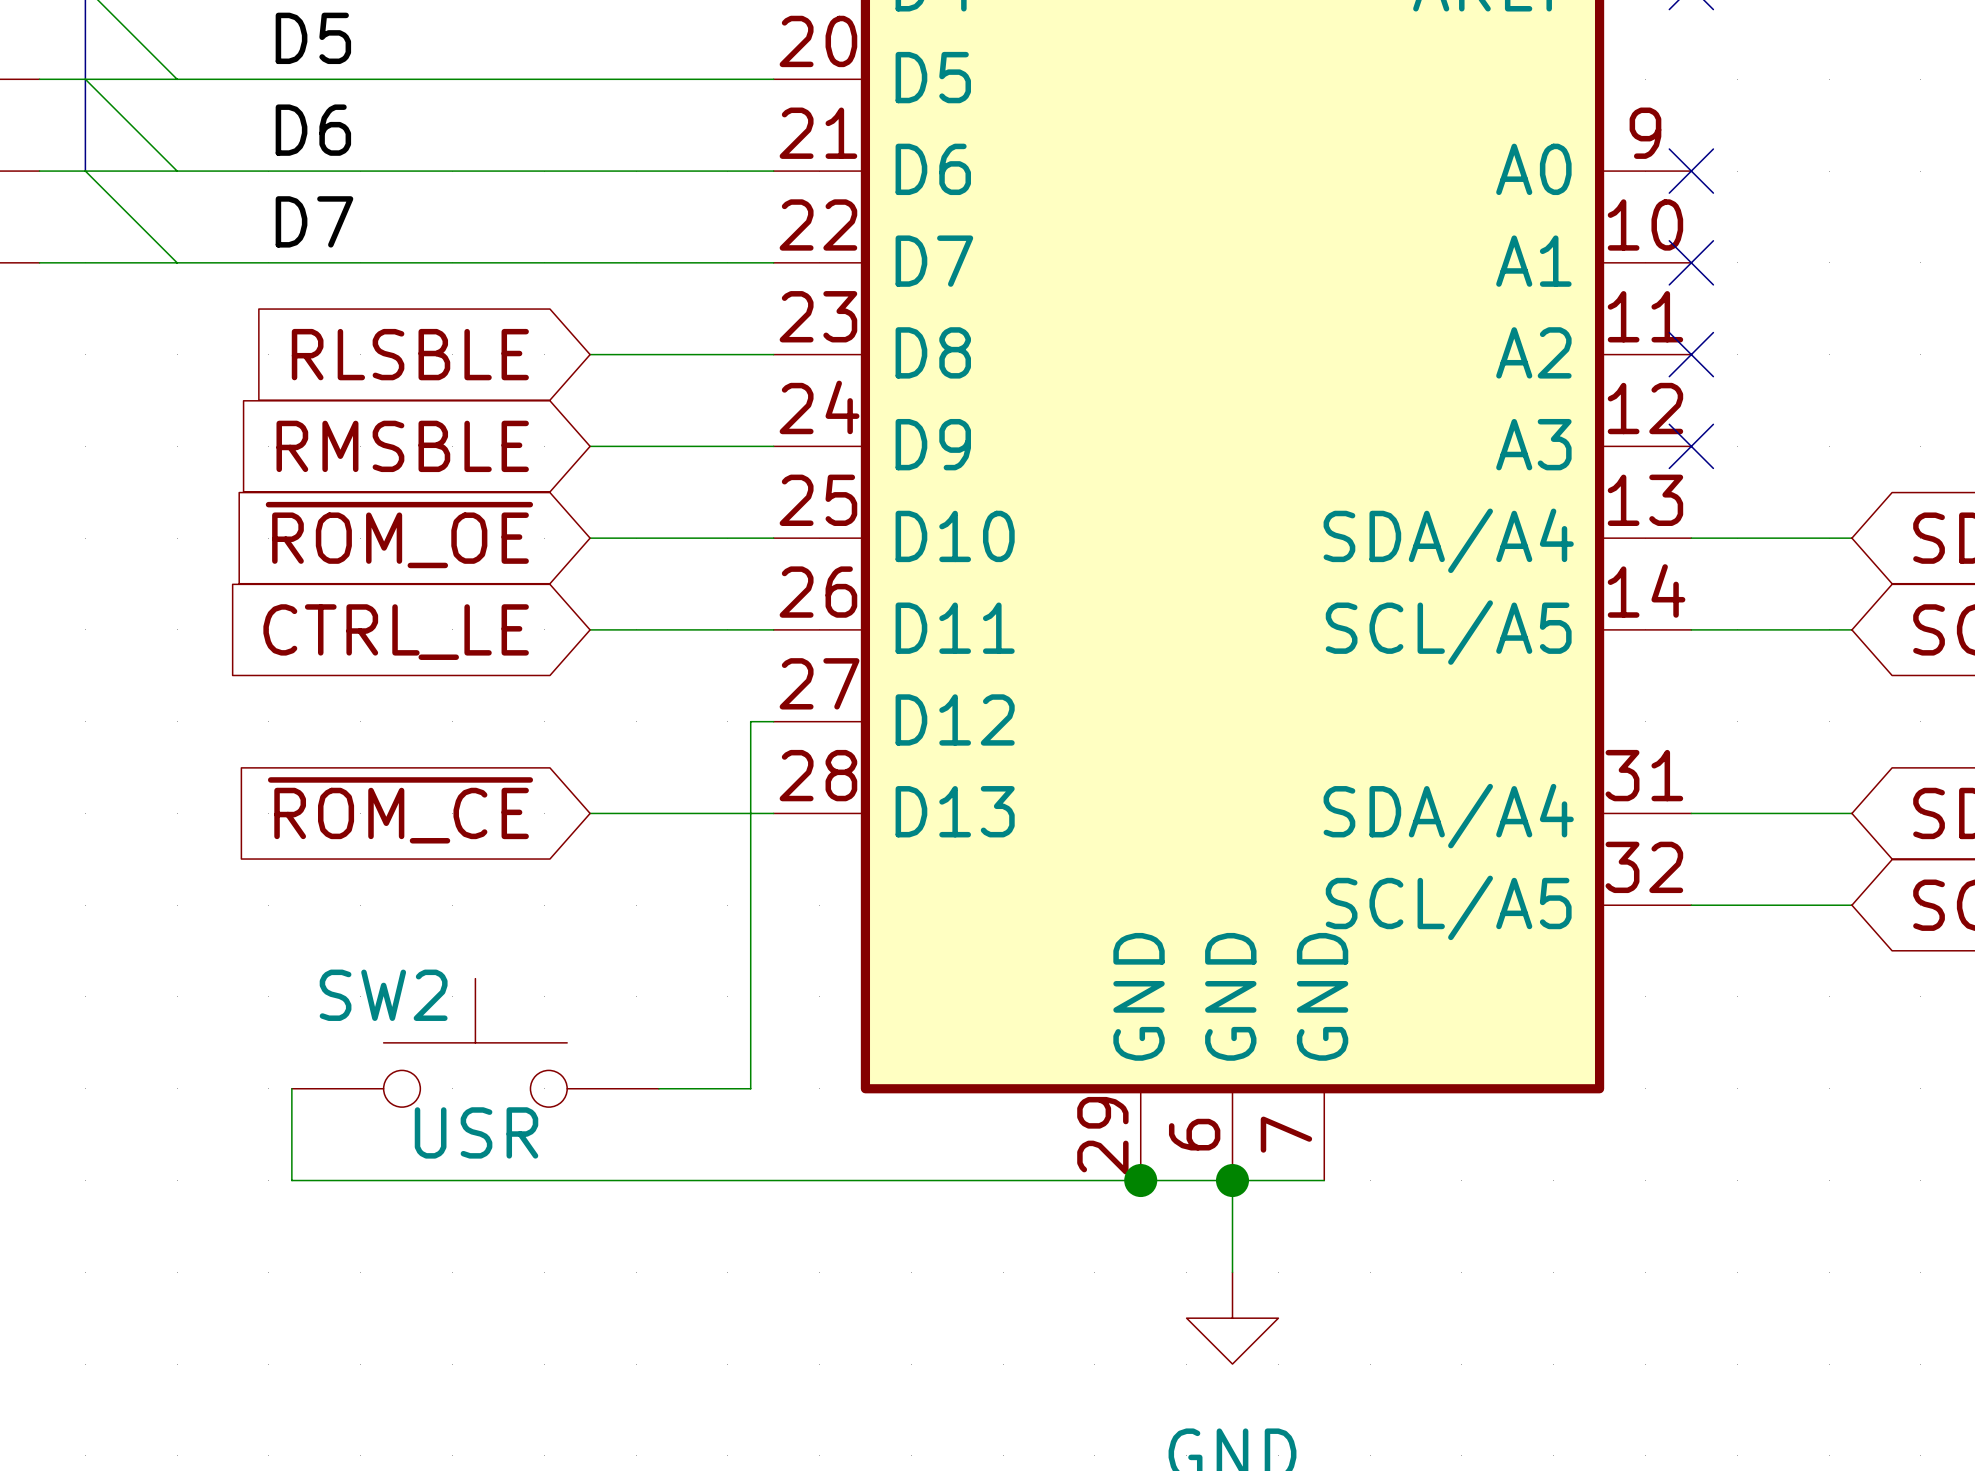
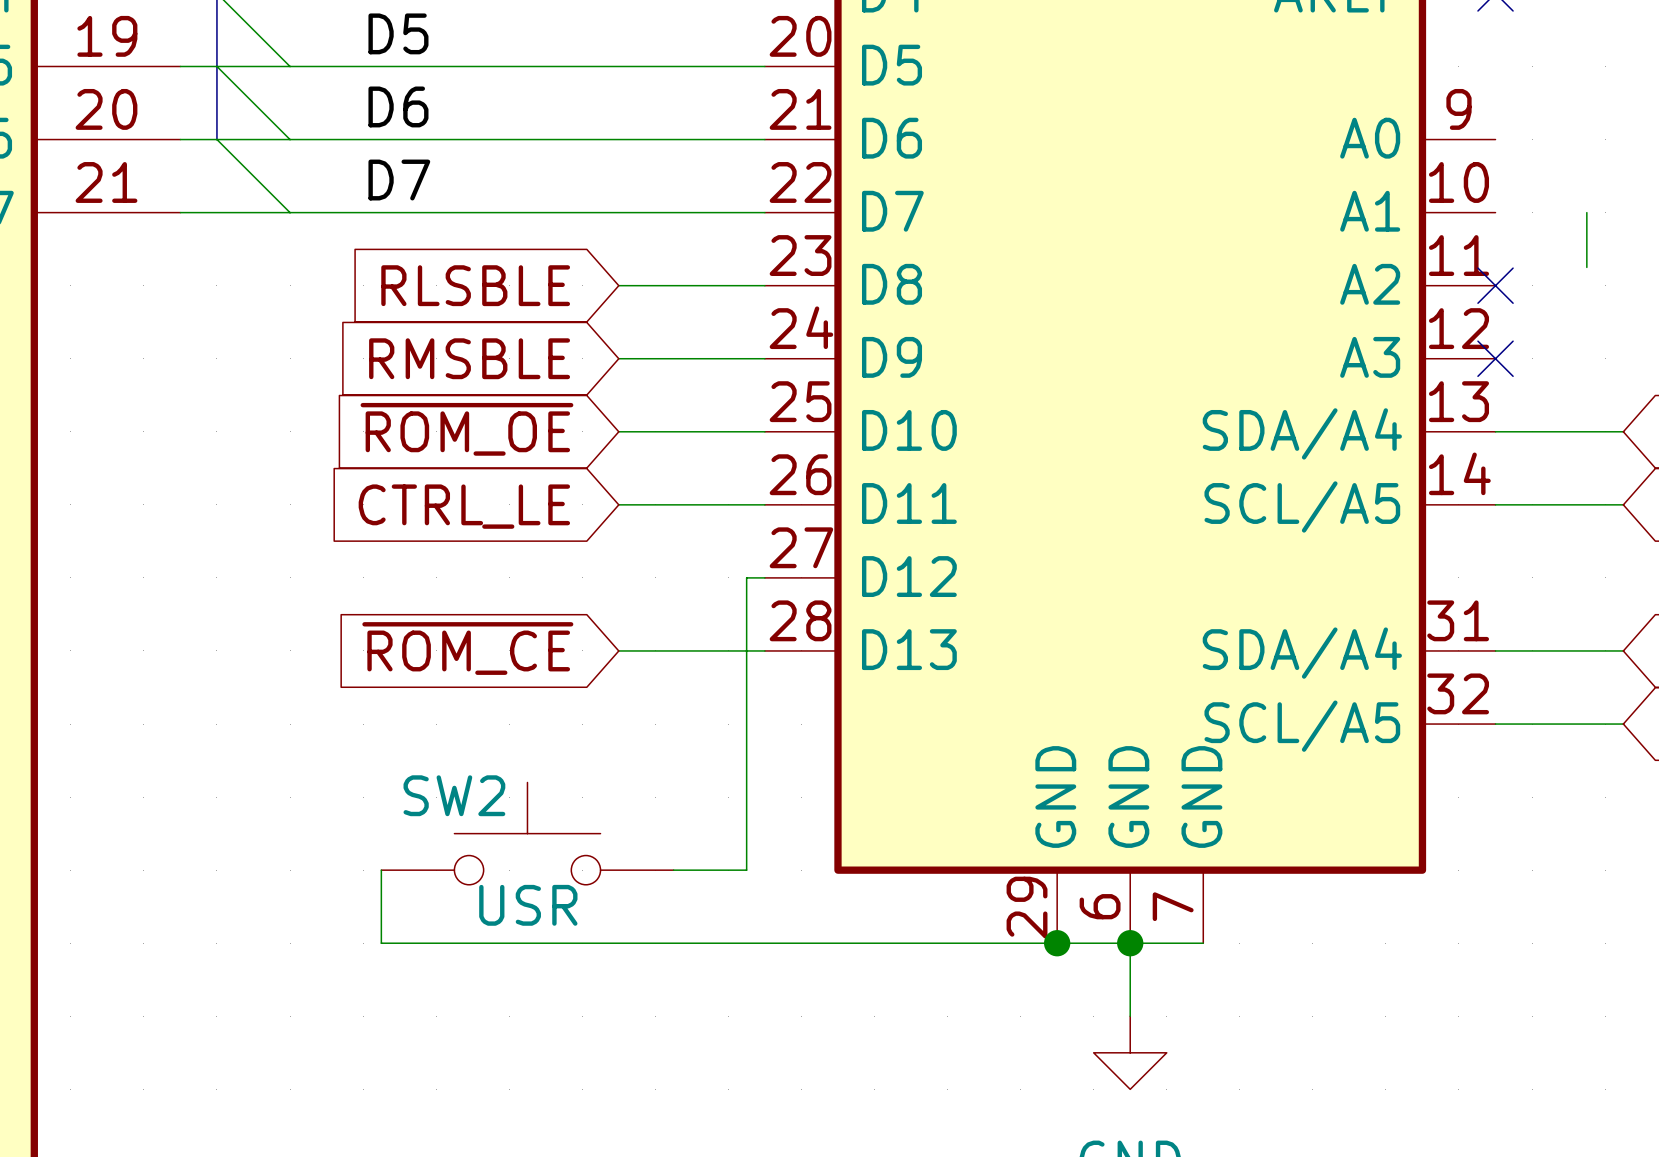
no-connect mark: (1691, 171) -> none
no-connect mark: (1691, 262) -> none
wire: none -> (1586, 212) (1586, 267)

